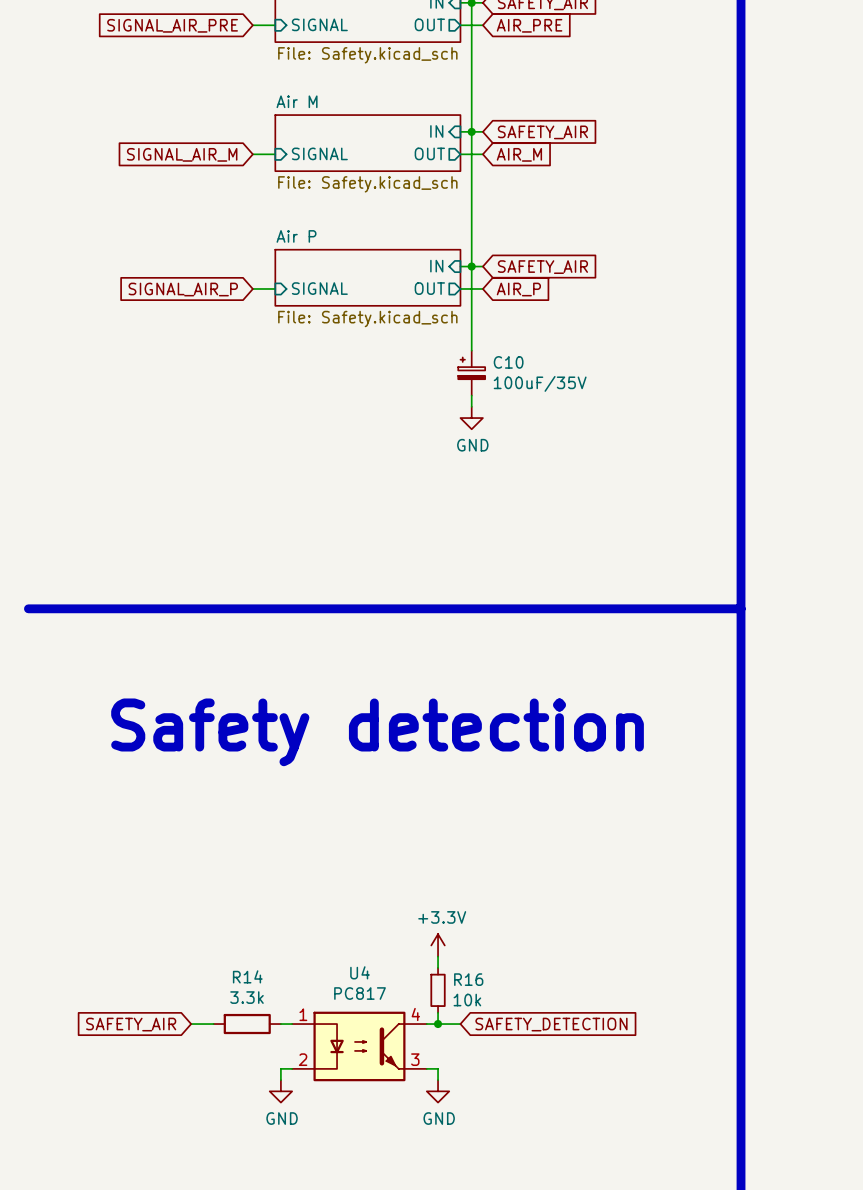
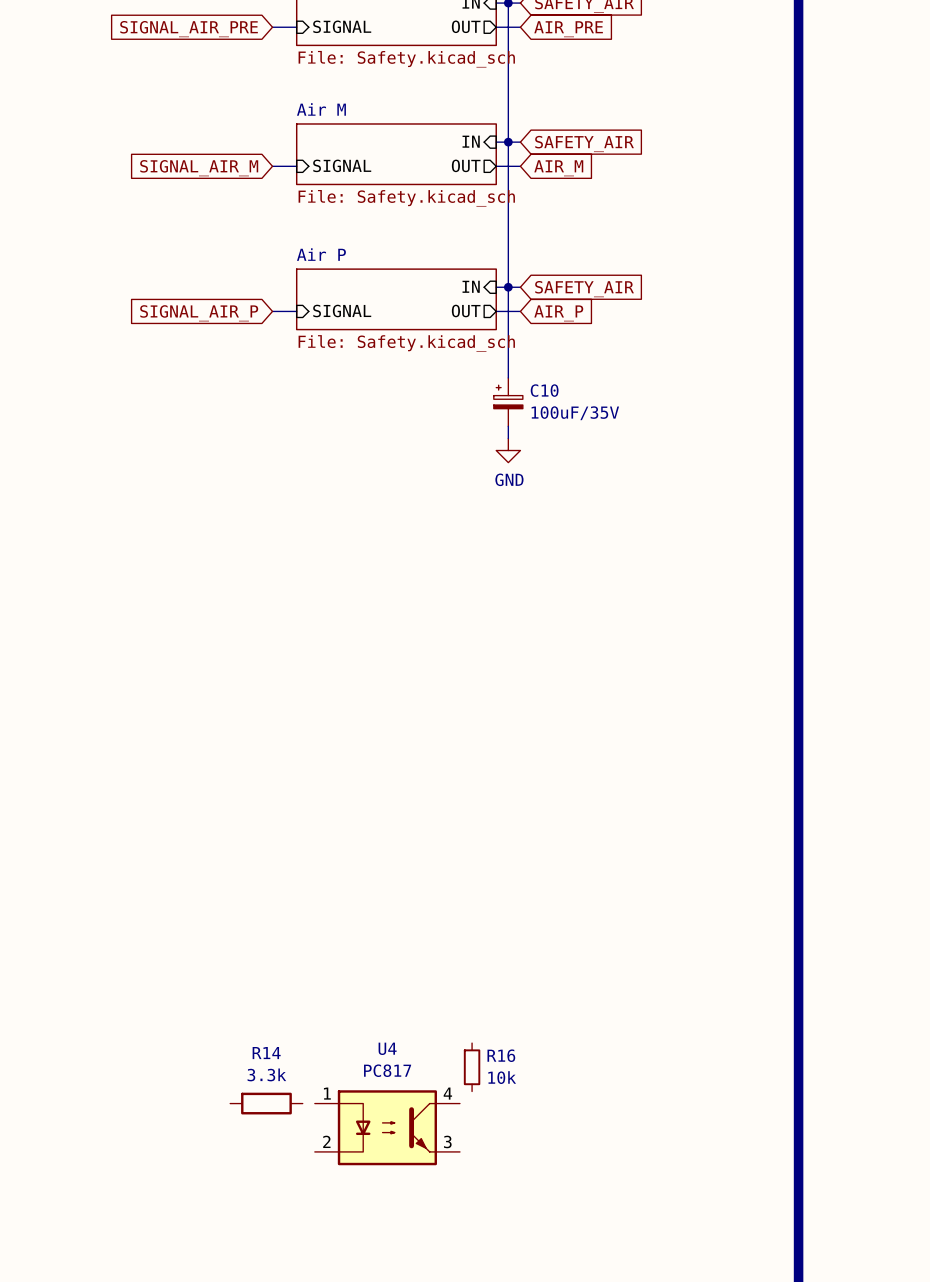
line: (28, 608) (741, 608) -> none
text: Safety detection (377, 732) -> none
power symbol: +3.3V (438, 945) -> none
wire: (438, 956) (438, 967) -> none
wire: (438, 1012) (438, 1024) -> none
global label: SAFETY_AIR (131, 1024) -> none
wire: (191, 1024) (213, 1024) -> none
wire: (280, 1024) (292, 1024) -> none
wire: (426, 1024) (460, 1024) -> none
junction: (438, 1024) -> none
global label: SAFETY_DETECTION (551, 1024) -> none
wire: (292, 1068) (280, 1068) (280, 1080) -> none
wire: (426, 1068) (438, 1068) (438, 1080) -> none
power symbol: GND (280, 1091) -> none
power symbol: GND (438, 1091) -> none

